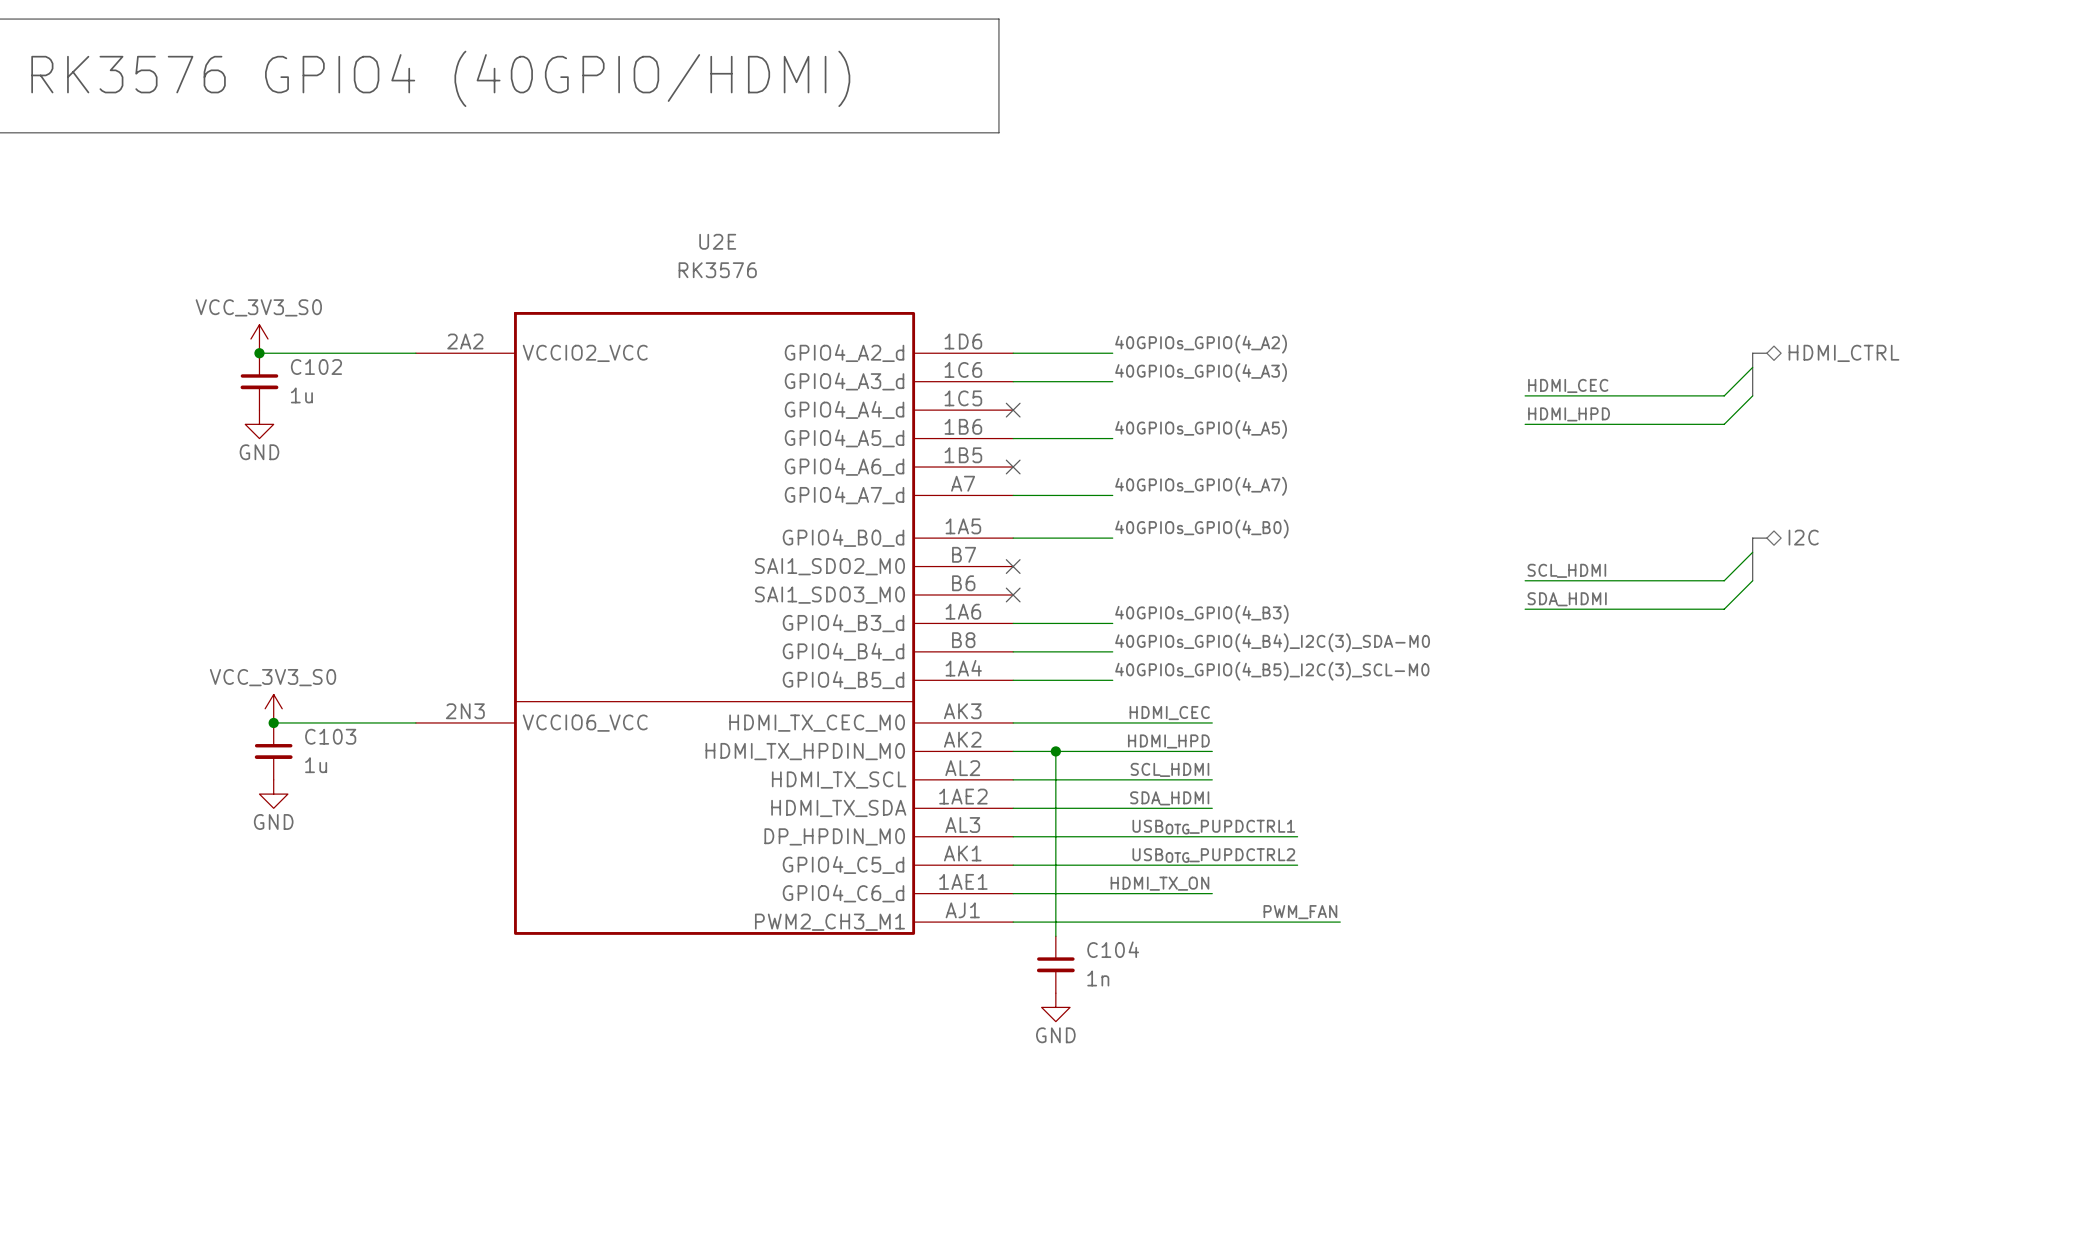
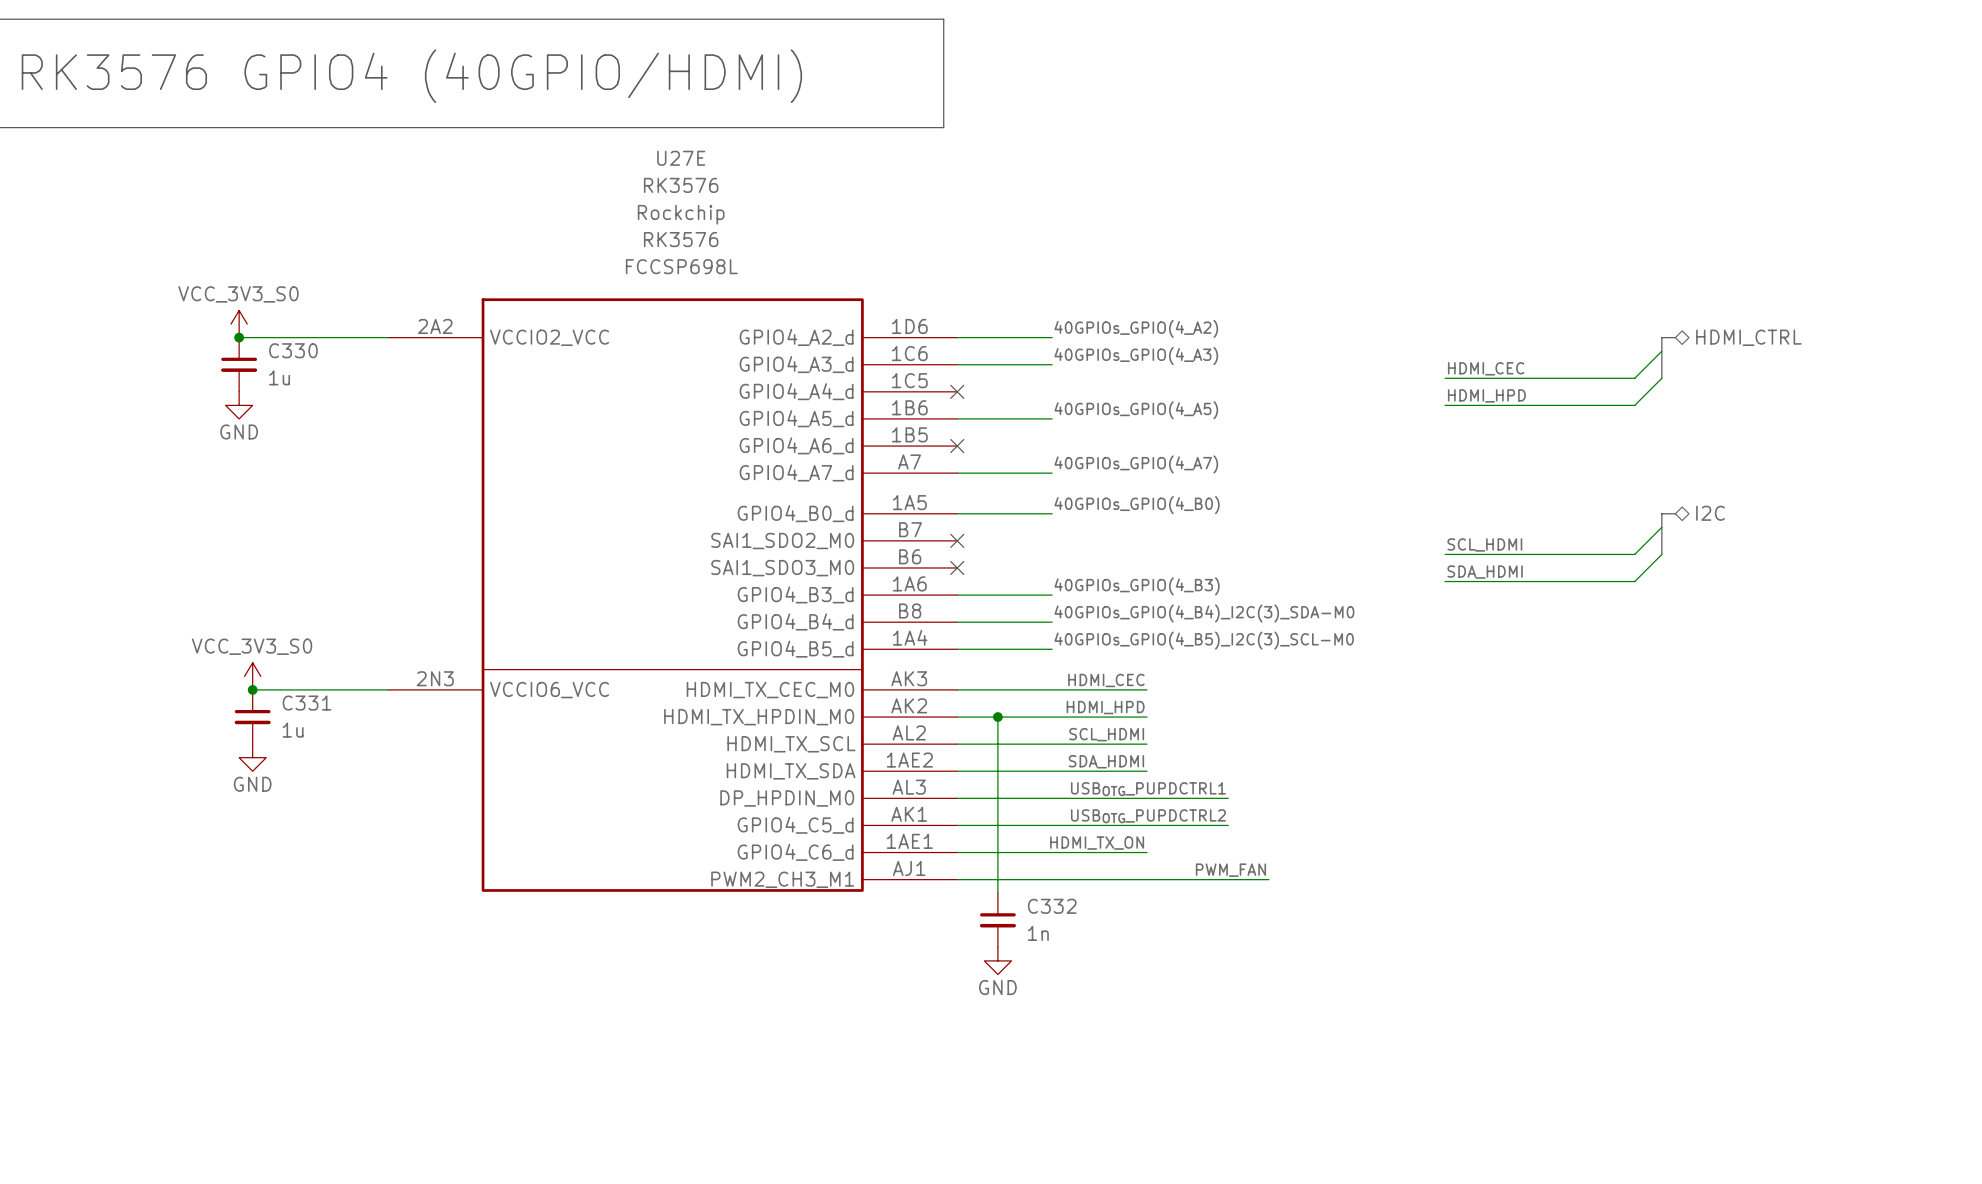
U2E text: none -> Rockchip (681, 214)
U2E name: U2E (717, 241) -> U27E (681, 158)
U2E text: none -> RK3576 (681, 239)
U2E value position: RK3576 (717, 270) -> RK3576 (681, 185)
U2E text: none -> FCCSP698L (681, 266)
C102 name: C102 (316, 366) -> C330 (293, 350)
C103 name: C103 (330, 736) -> C331 (306, 703)
C104 name: C104 (1113, 949) -> C332 (1052, 906)

